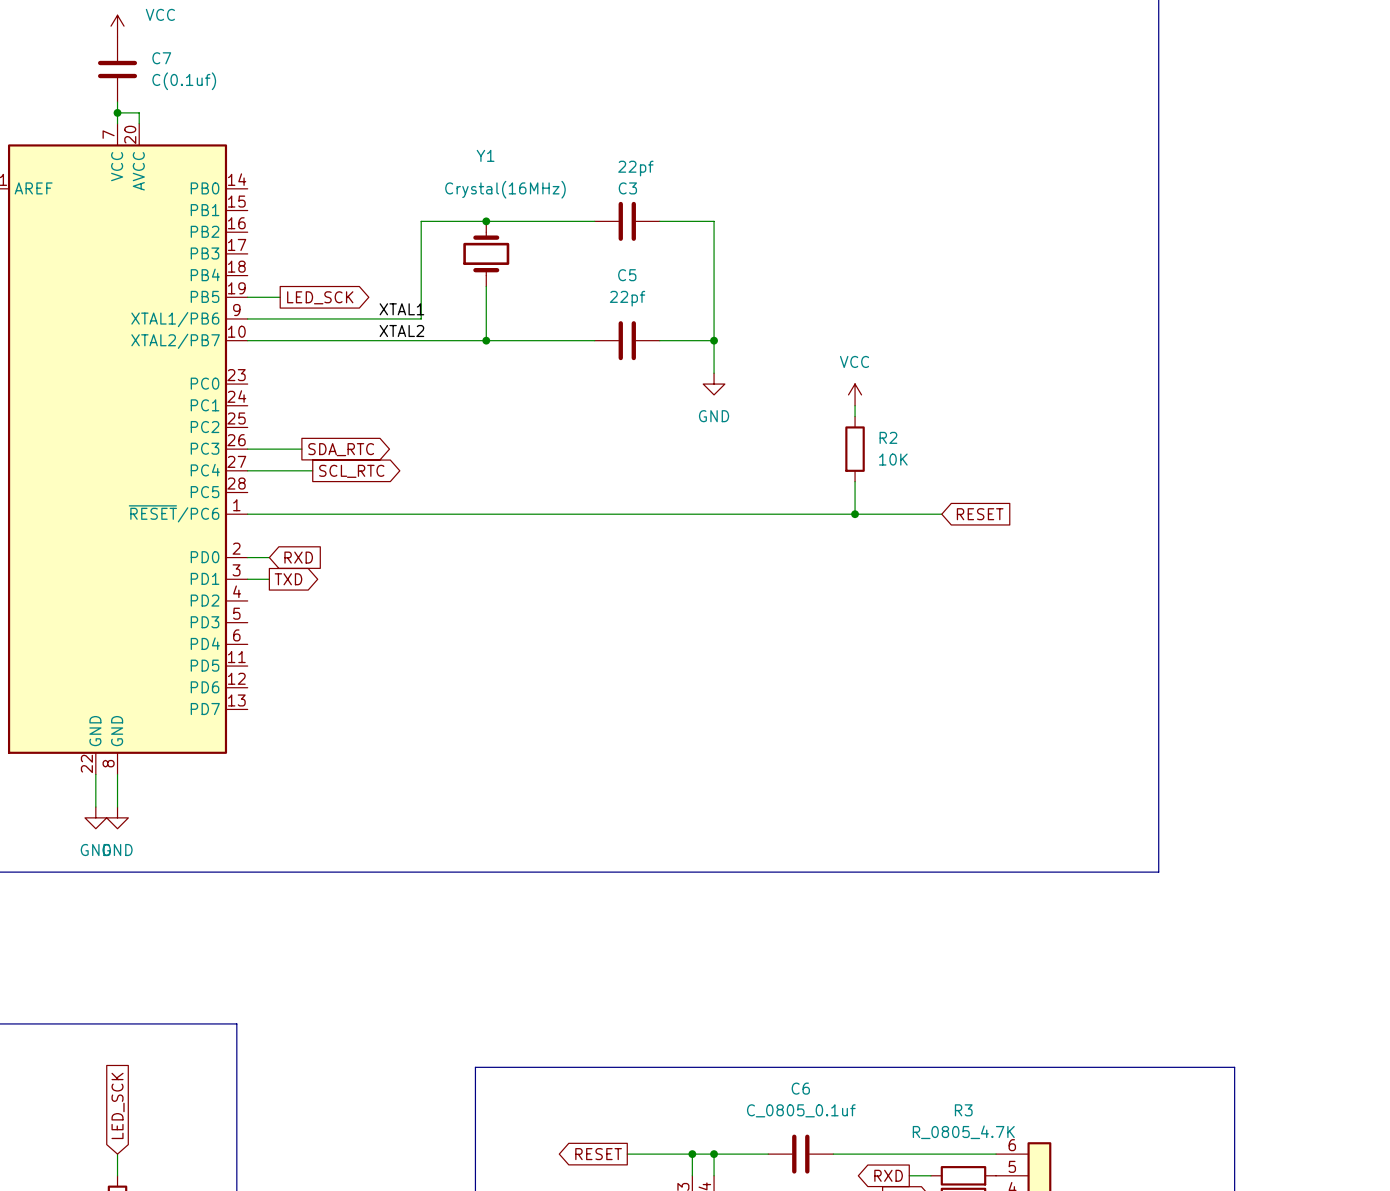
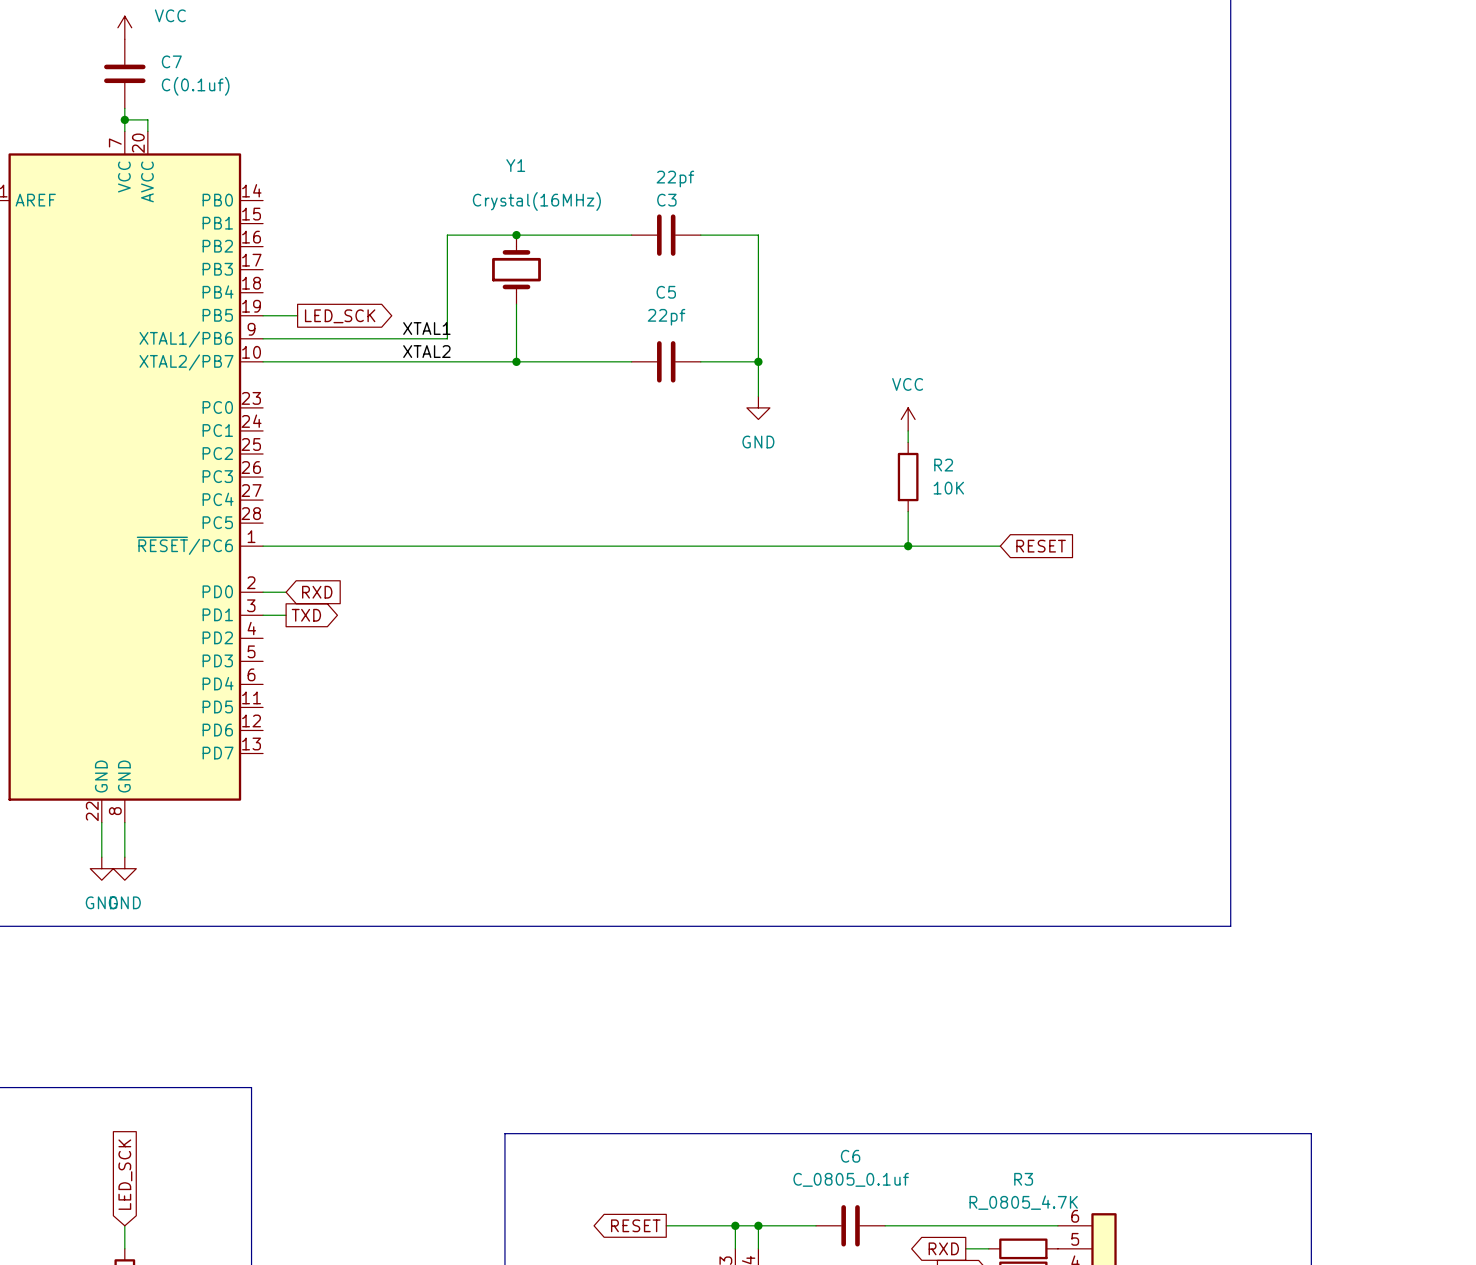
wire: (247, 449) (301, 449) -> none
global label: SDA_RTC (341, 449) -> none
wire: (247, 470) (312, 470) -> none
global label: SCL_RTC (351, 471) -> none

